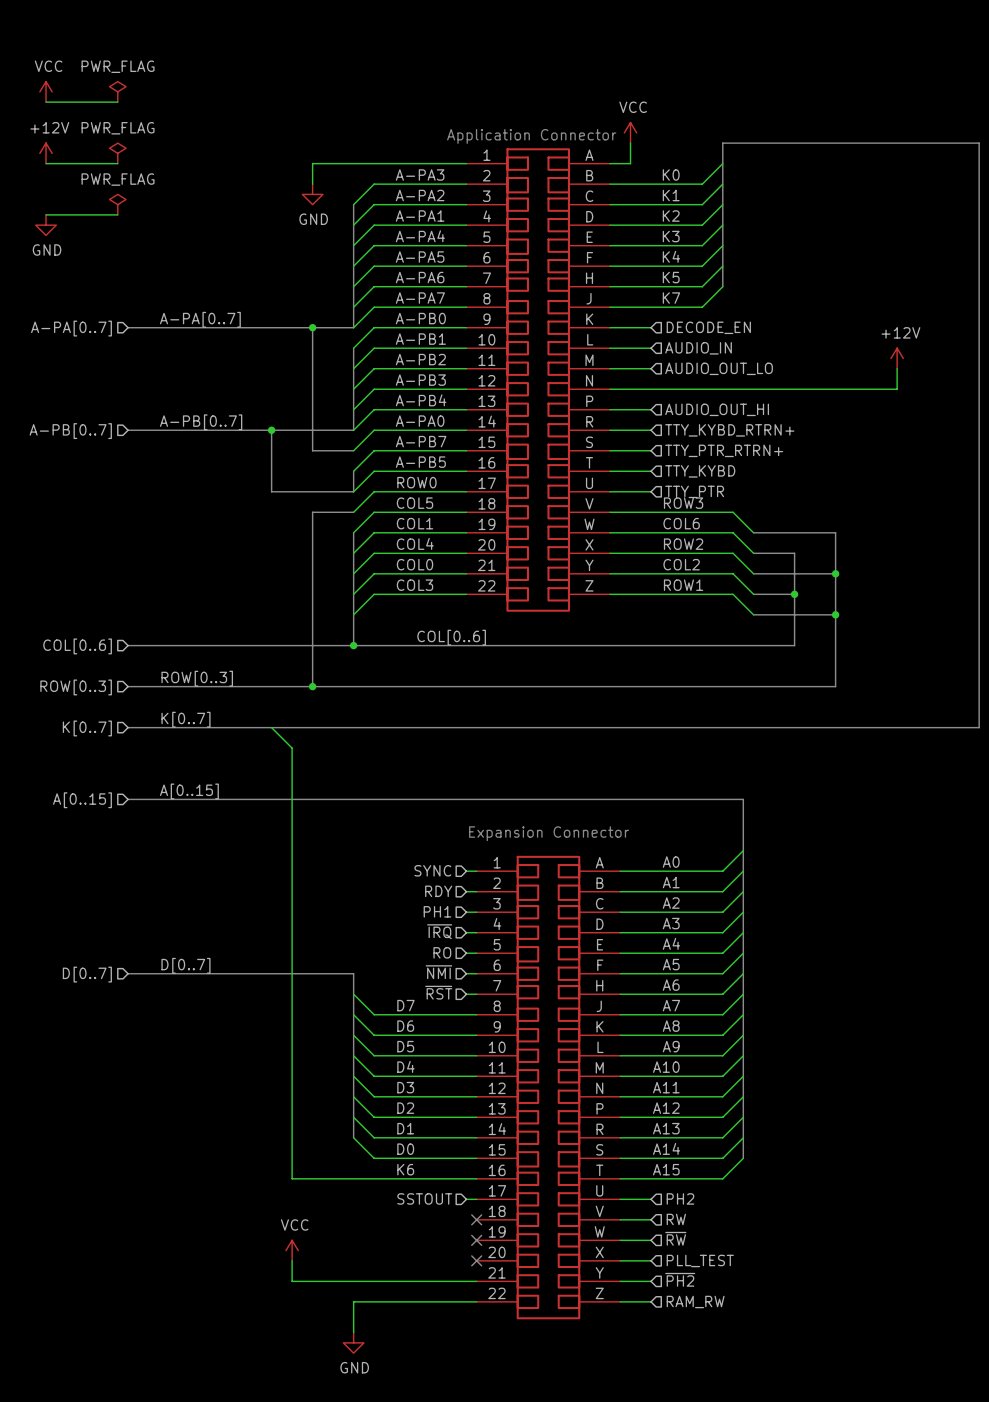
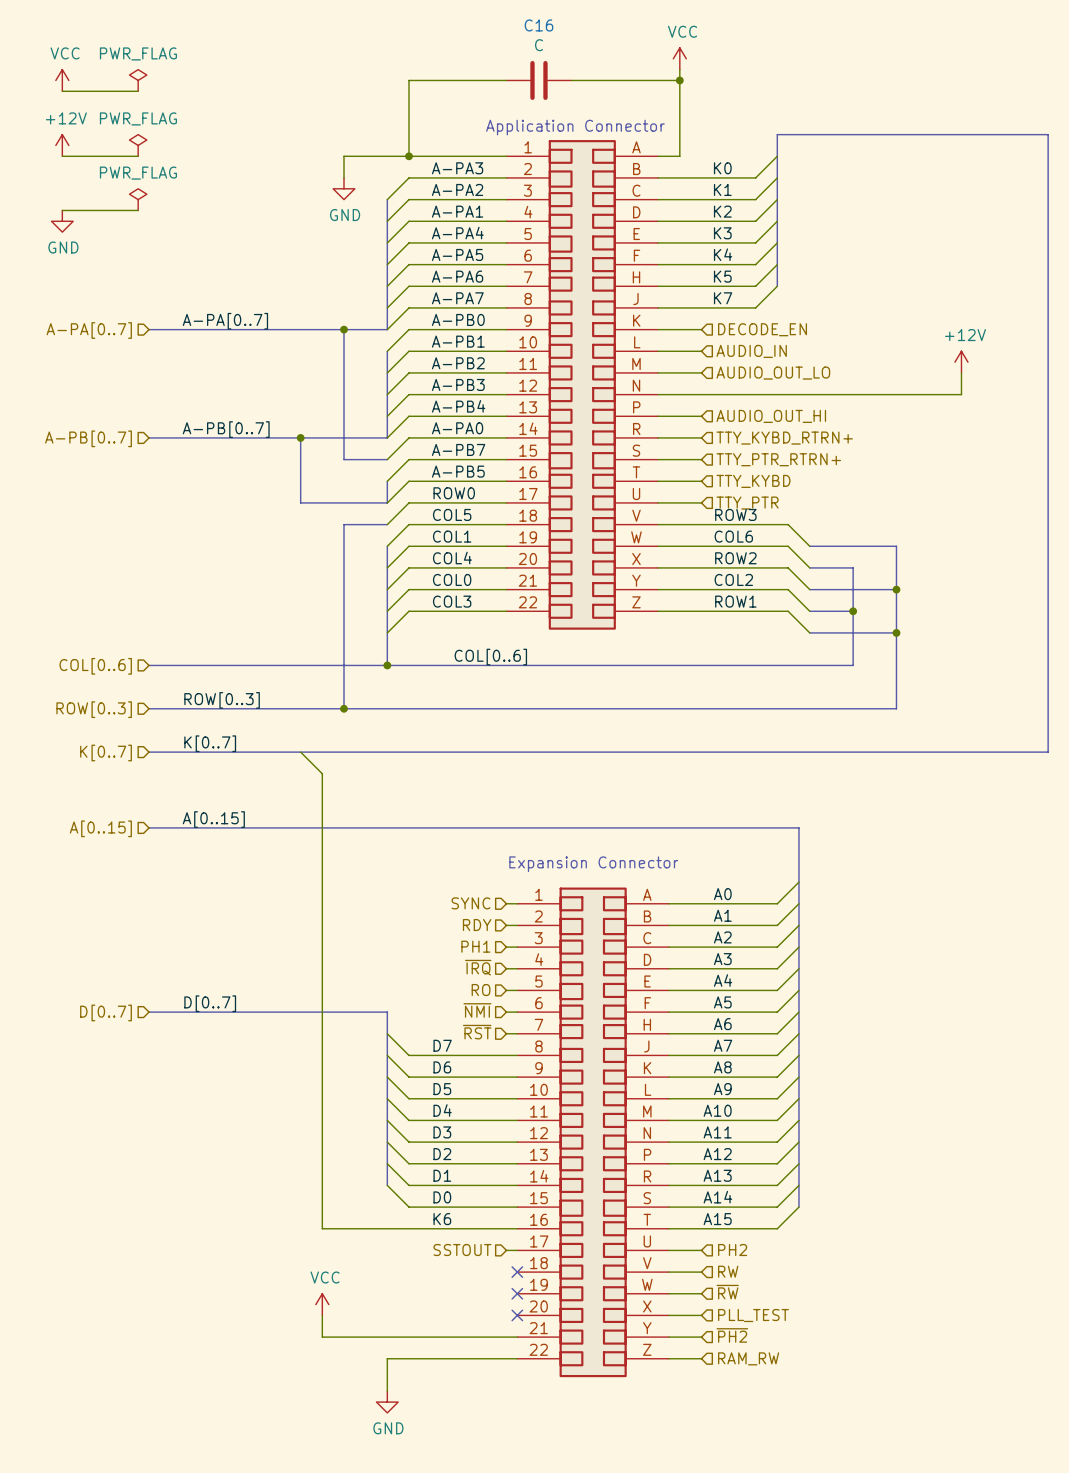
wire: none -> (679, 69) (679, 134)
wire: none -> (506, 80) (408, 80) (408, 156)
C16: none -> C (538, 80)
wire: none -> (571, 80) (679, 80)
junction: none -> (679, 80)
power symbol position: VCC (630, 132) -> VCC (679, 58)
junction: none -> (408, 156)

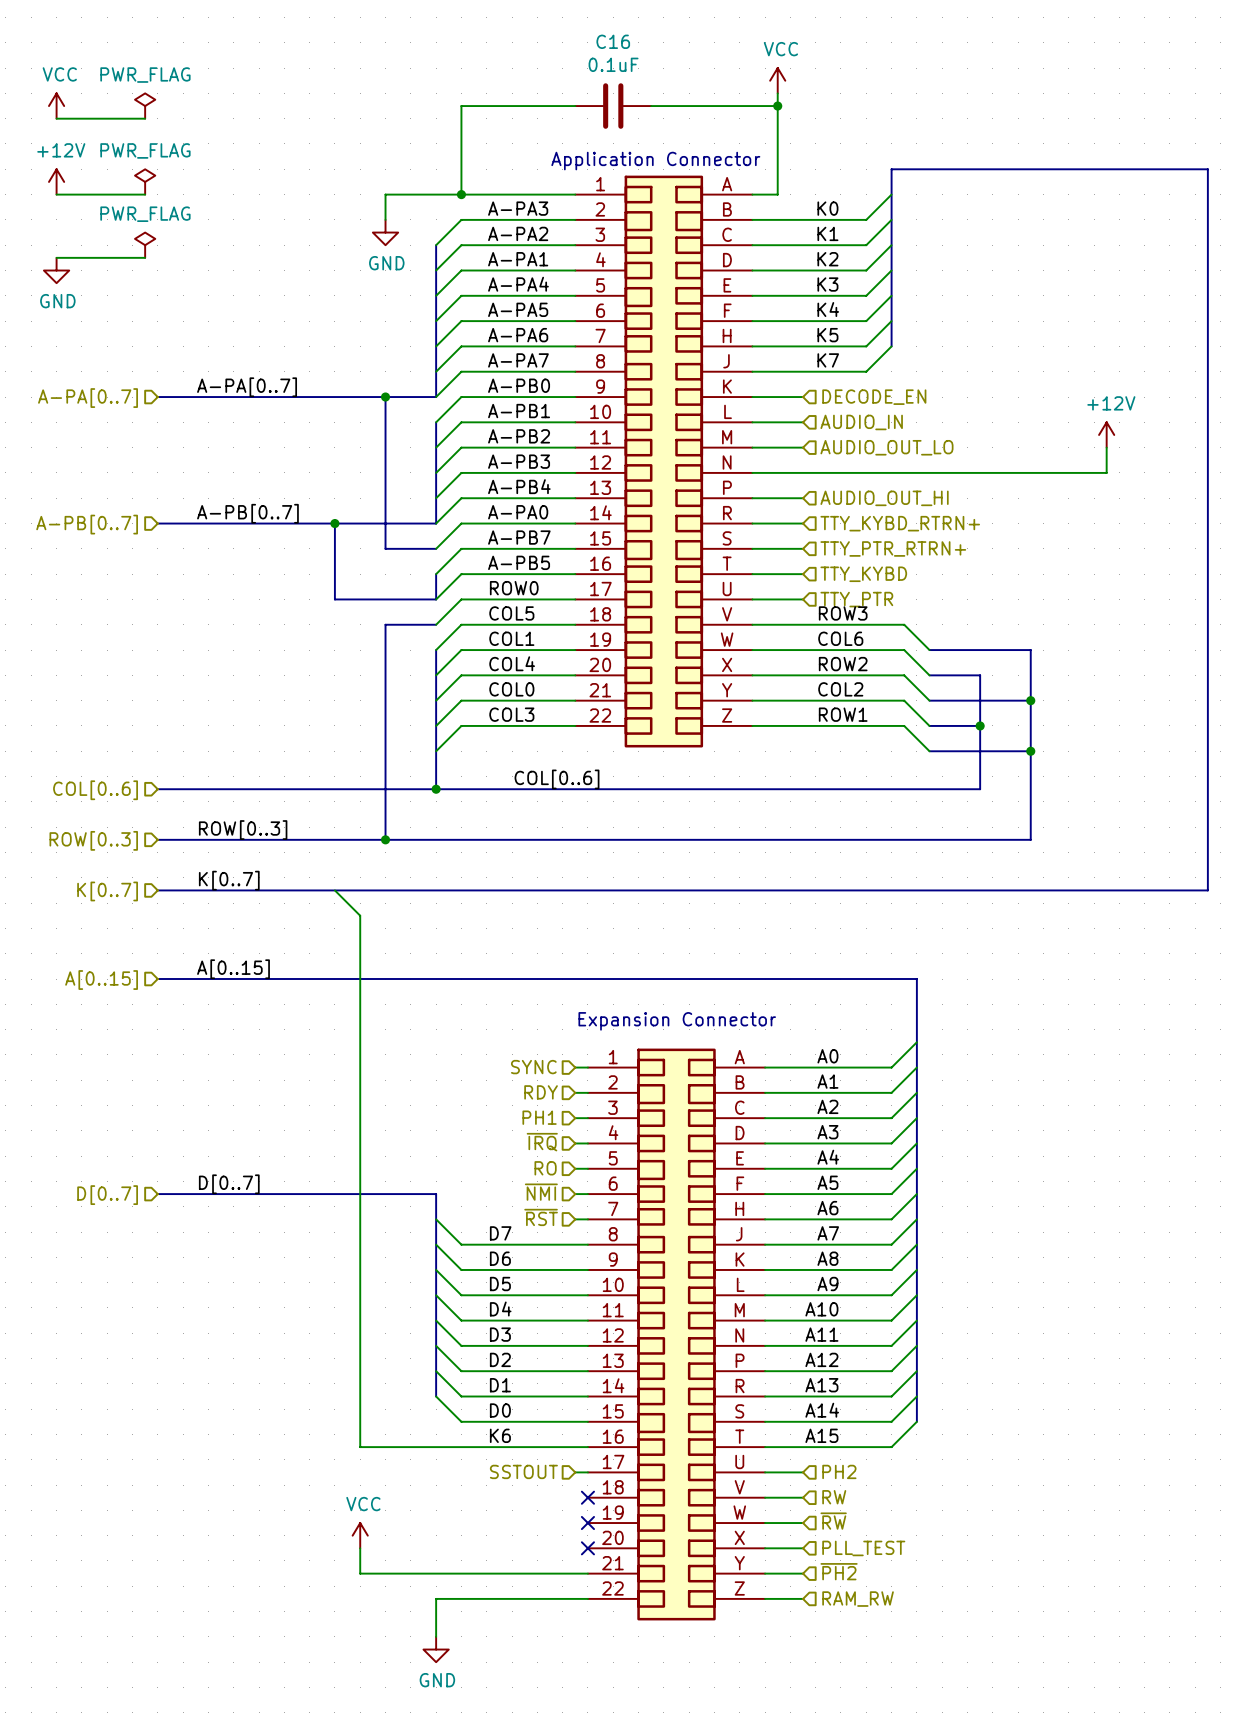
C16 value: C (538, 45) -> 0.1uF (613, 64)

